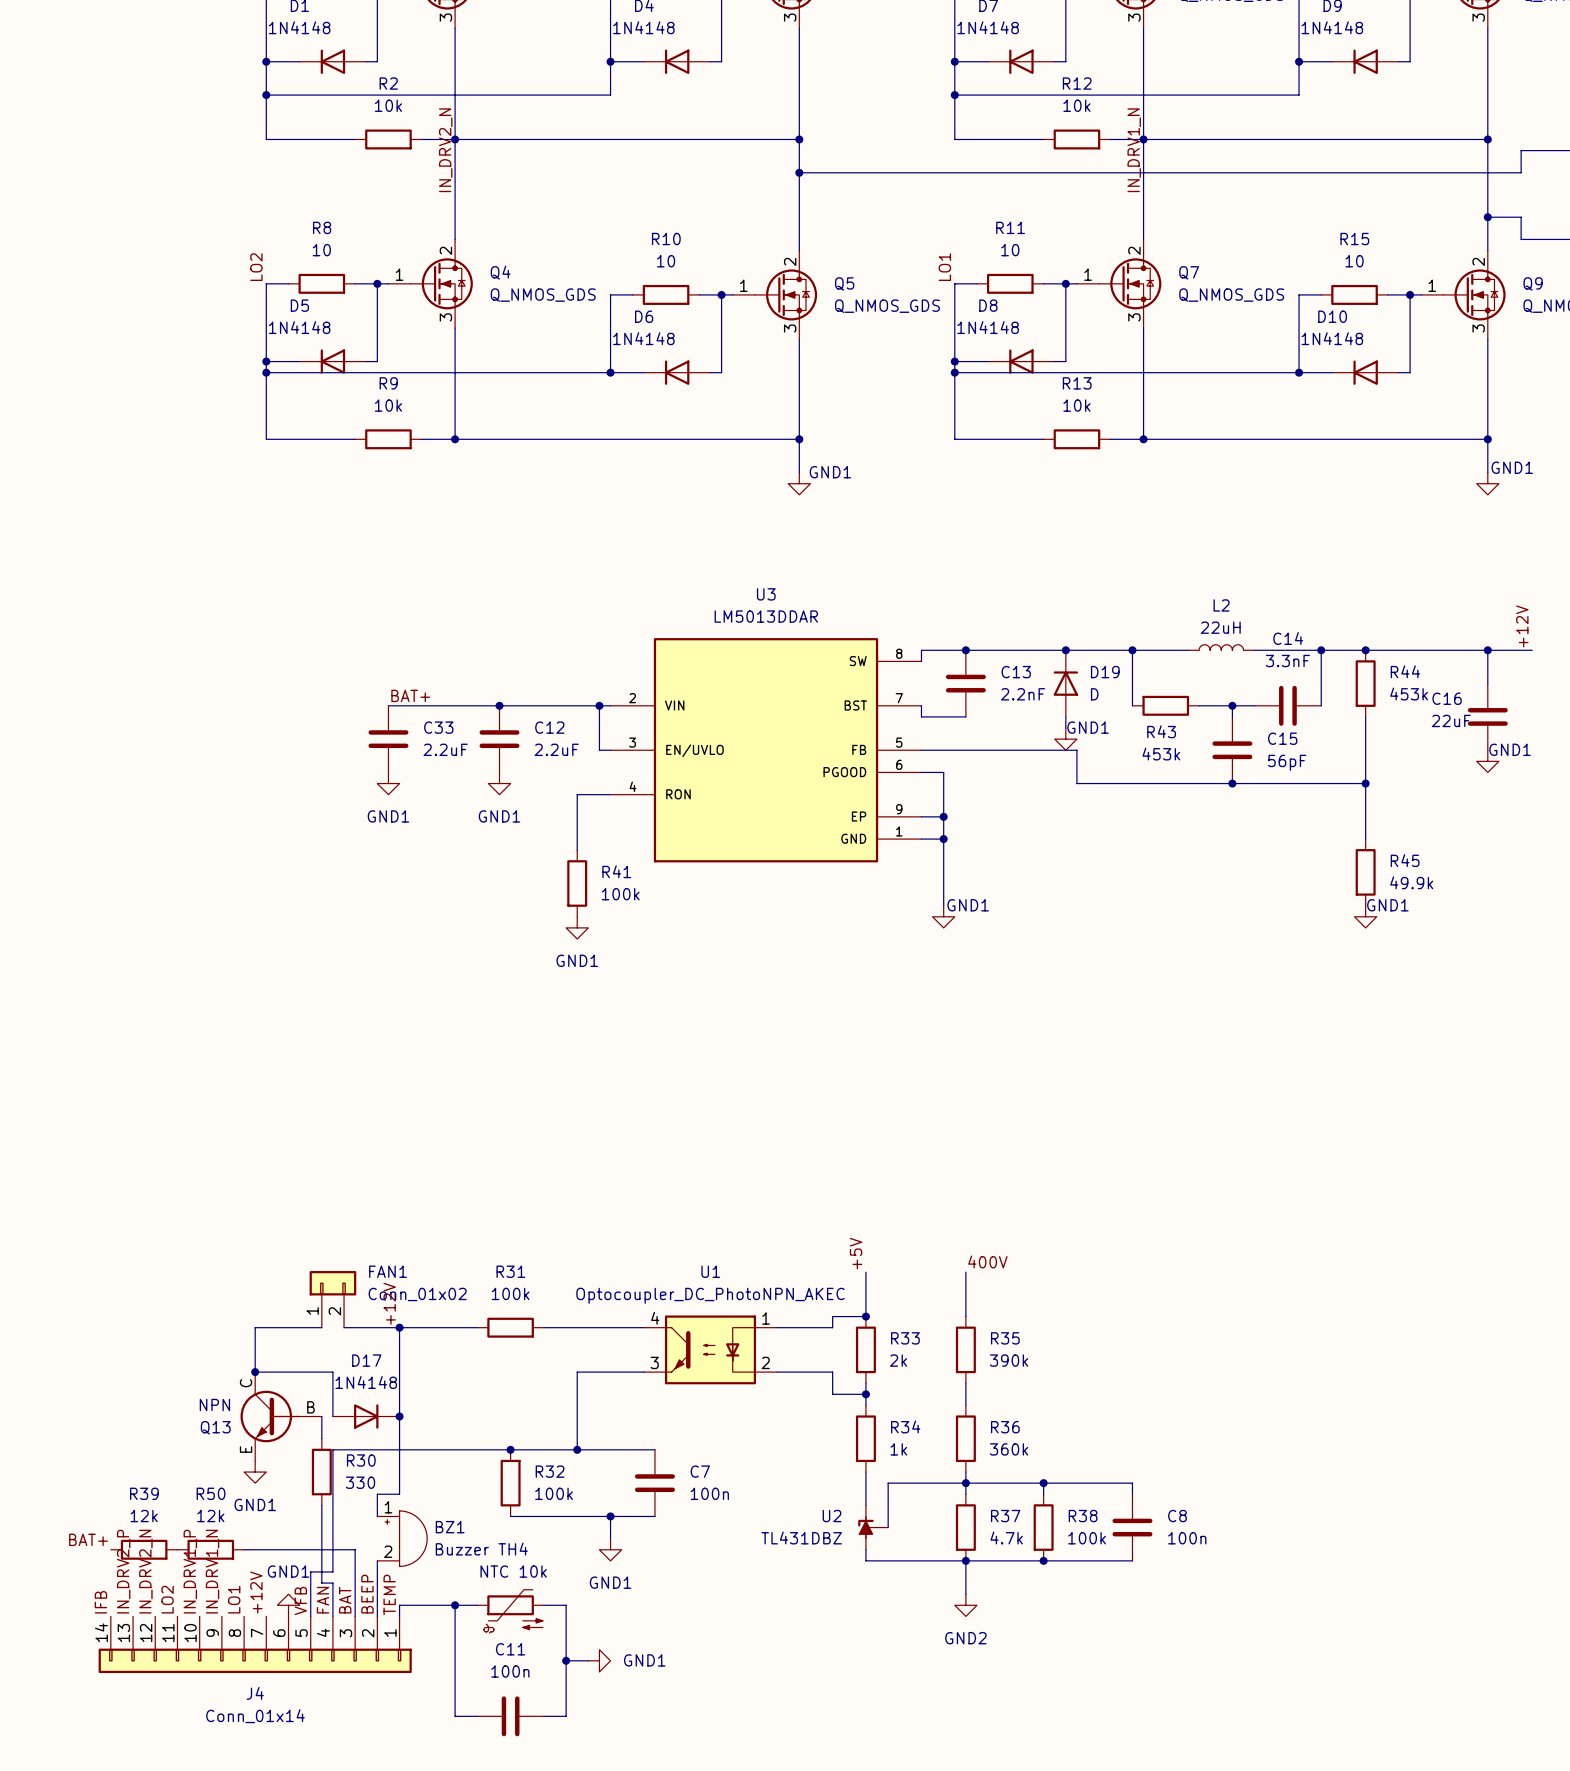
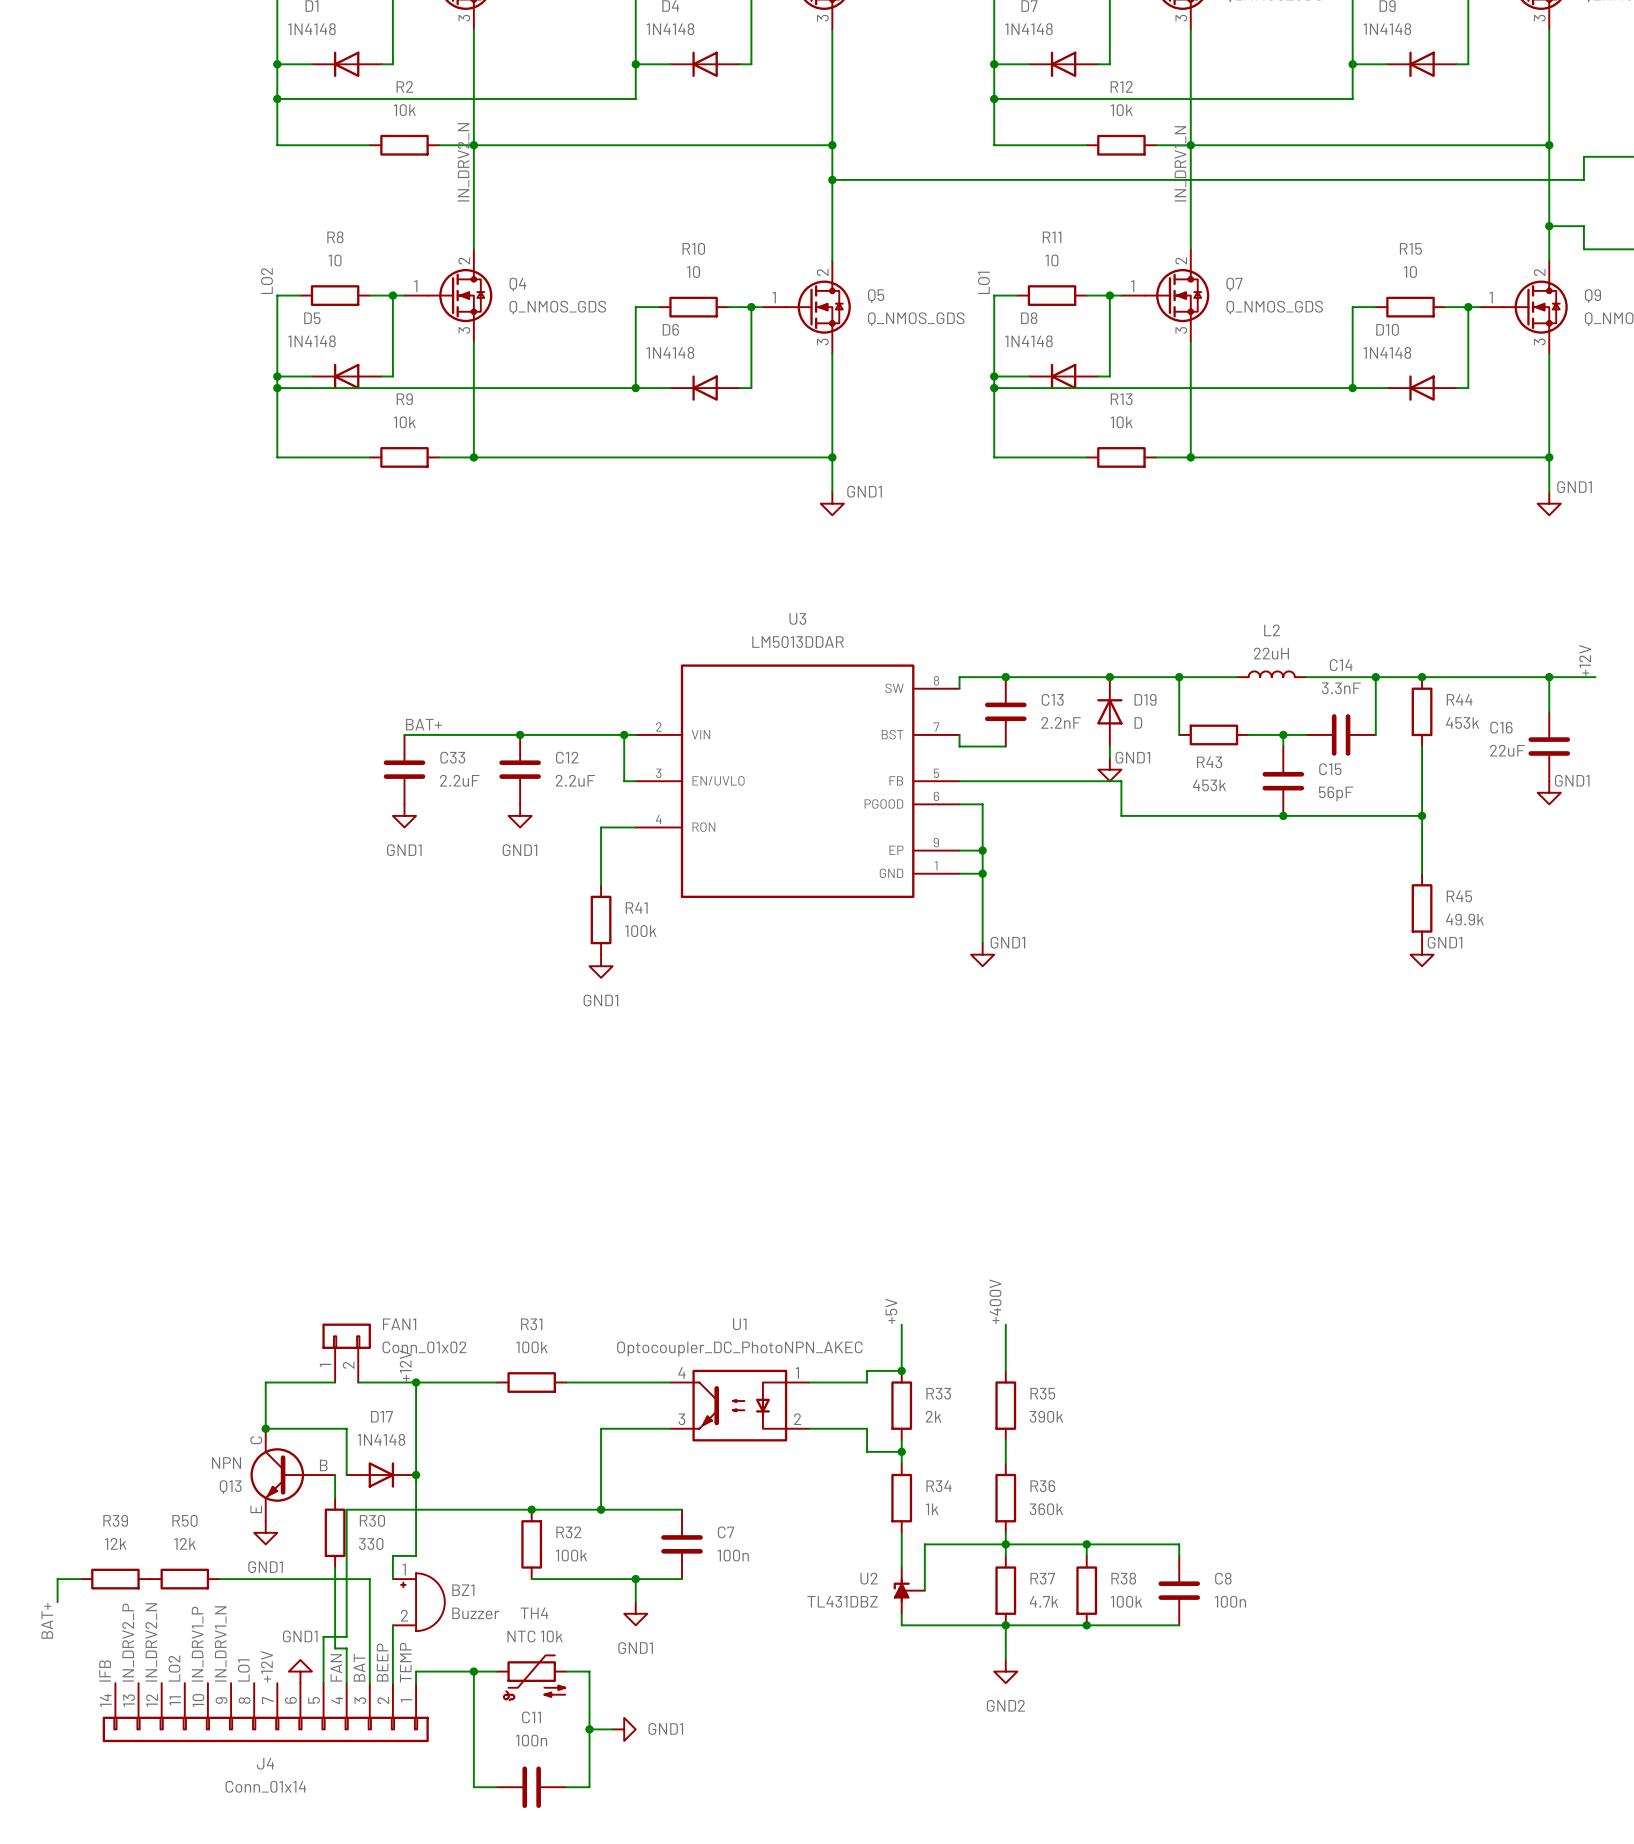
label: 400V (987, 1261) -> +400V (995, 1301)
wire: none -> (80, 1579) (57, 1579) (57, 1602)
label rotation: 0° (88, 1539) -> 90° counterclockwise (47, 1620)
R39 position: (144, 1549) -> (115, 1579)
R50 position: (210, 1549) -> (184, 1579)
wire: (244, 1549) (355, 1549) -> (219, 1579) (369, 1579) (369, 1613)
label: VFB (300, 1600) -> none

